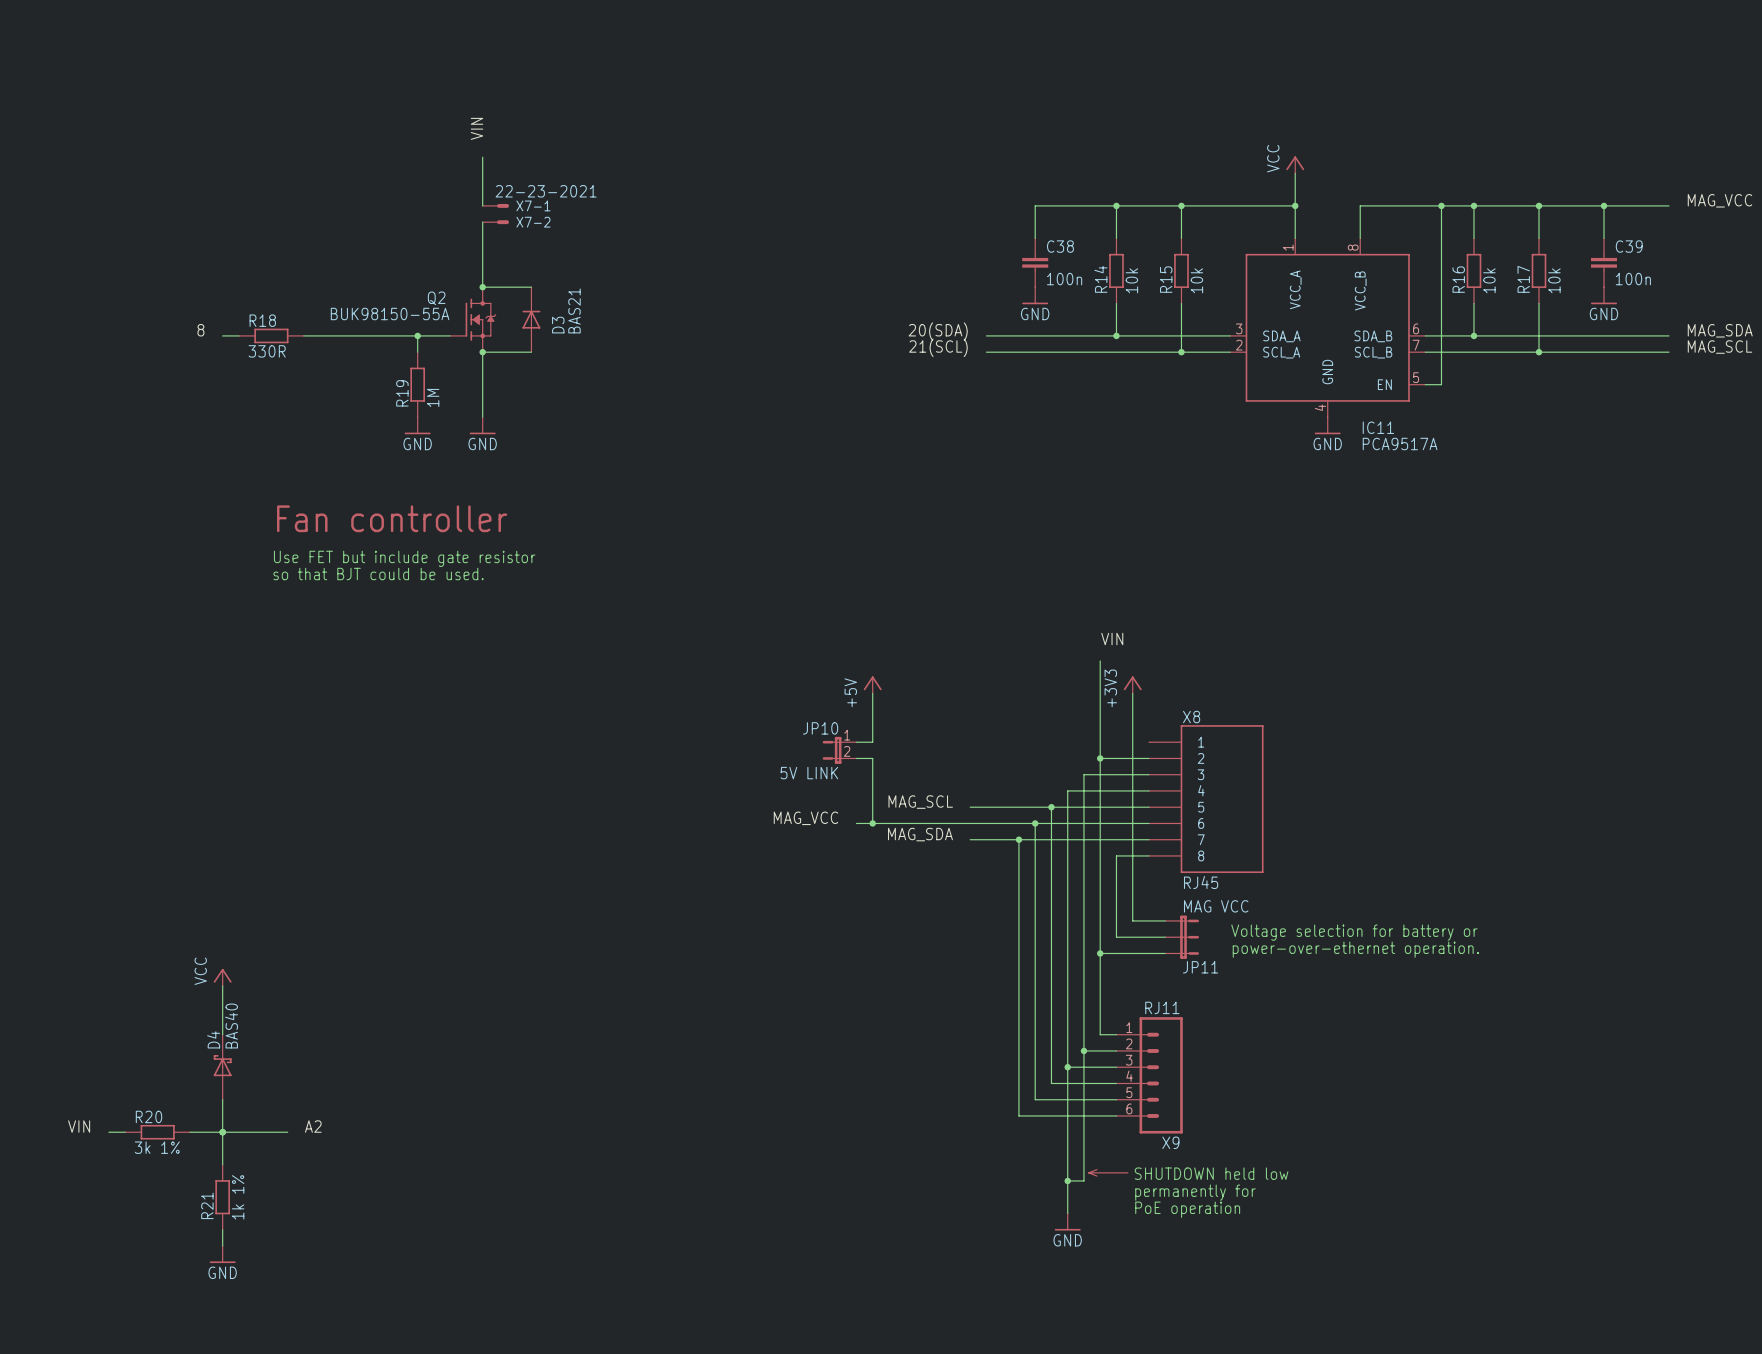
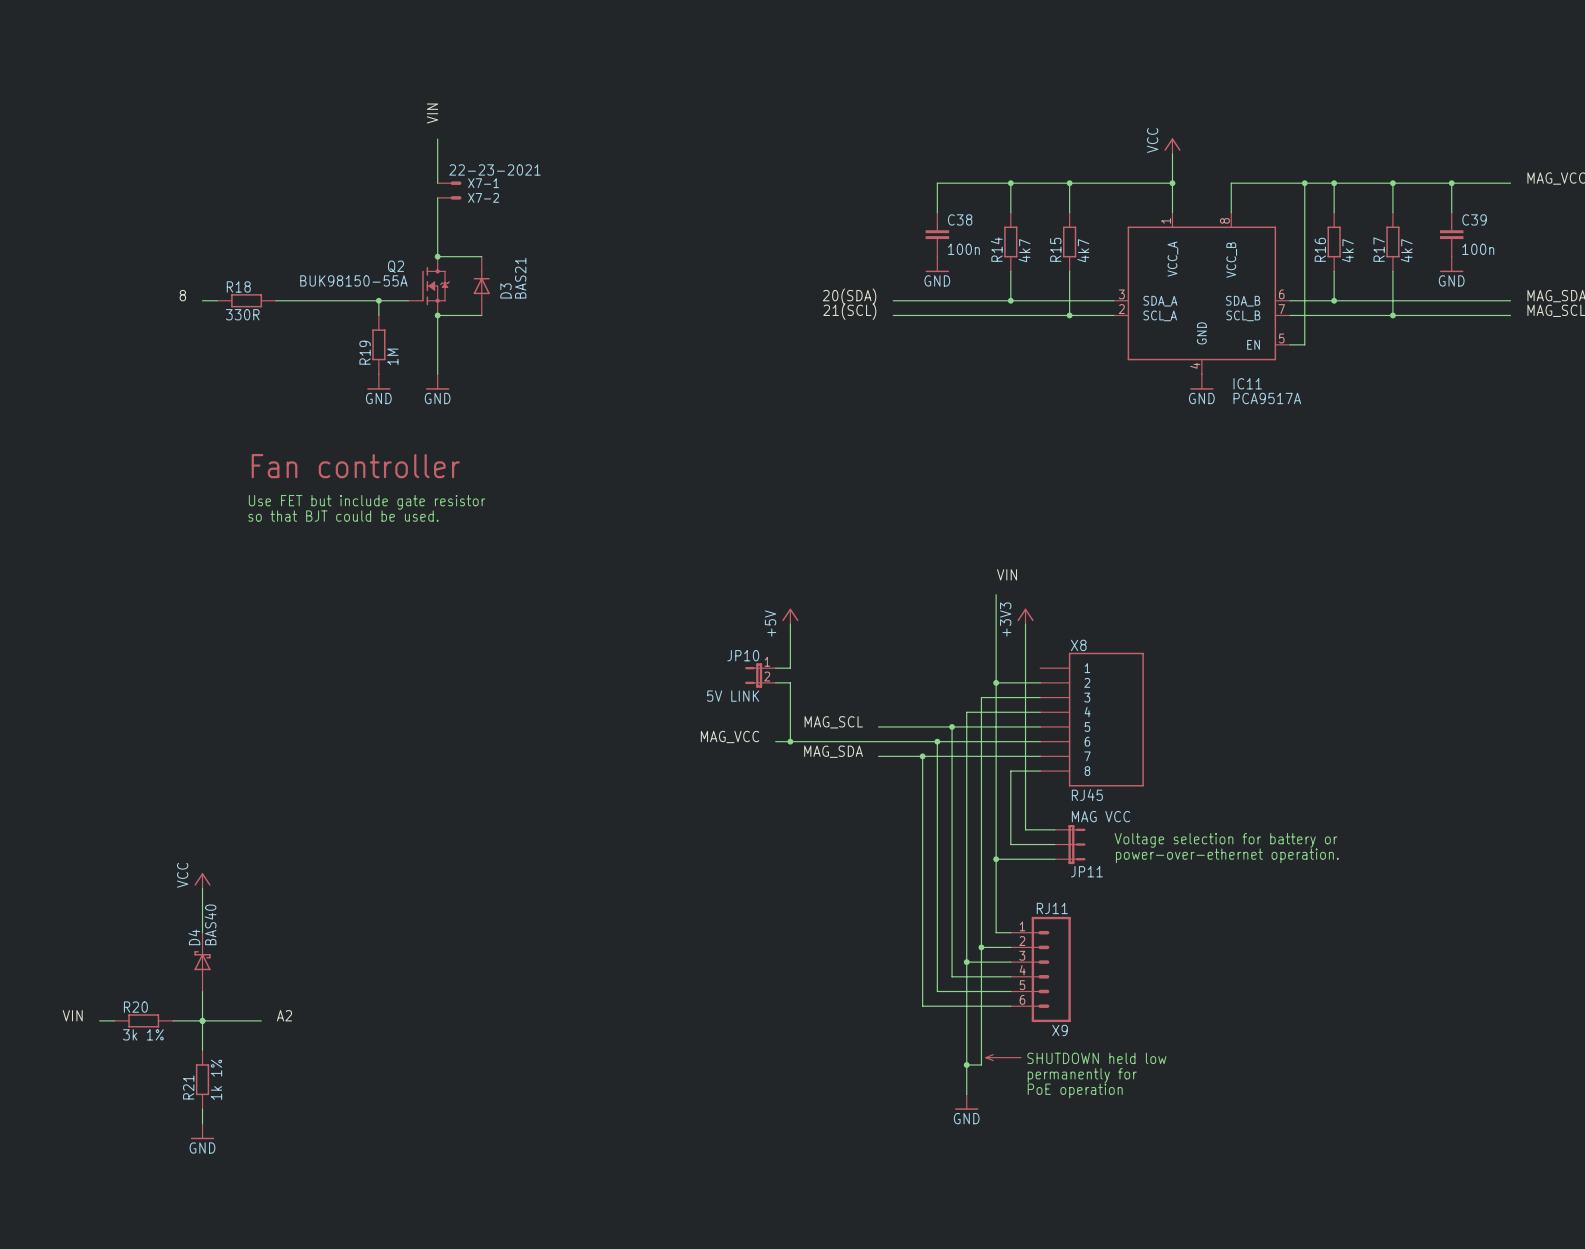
R14 value: 10k (1131, 280) -> 4k7 (1024, 250)
R15 value: 10k (1196, 280) -> 4k7 (1083, 250)
R16 value: 10k (1489, 280) -> 4k7 (1347, 250)
R17 value: 10k (1554, 280) -> 4k7 (1406, 250)

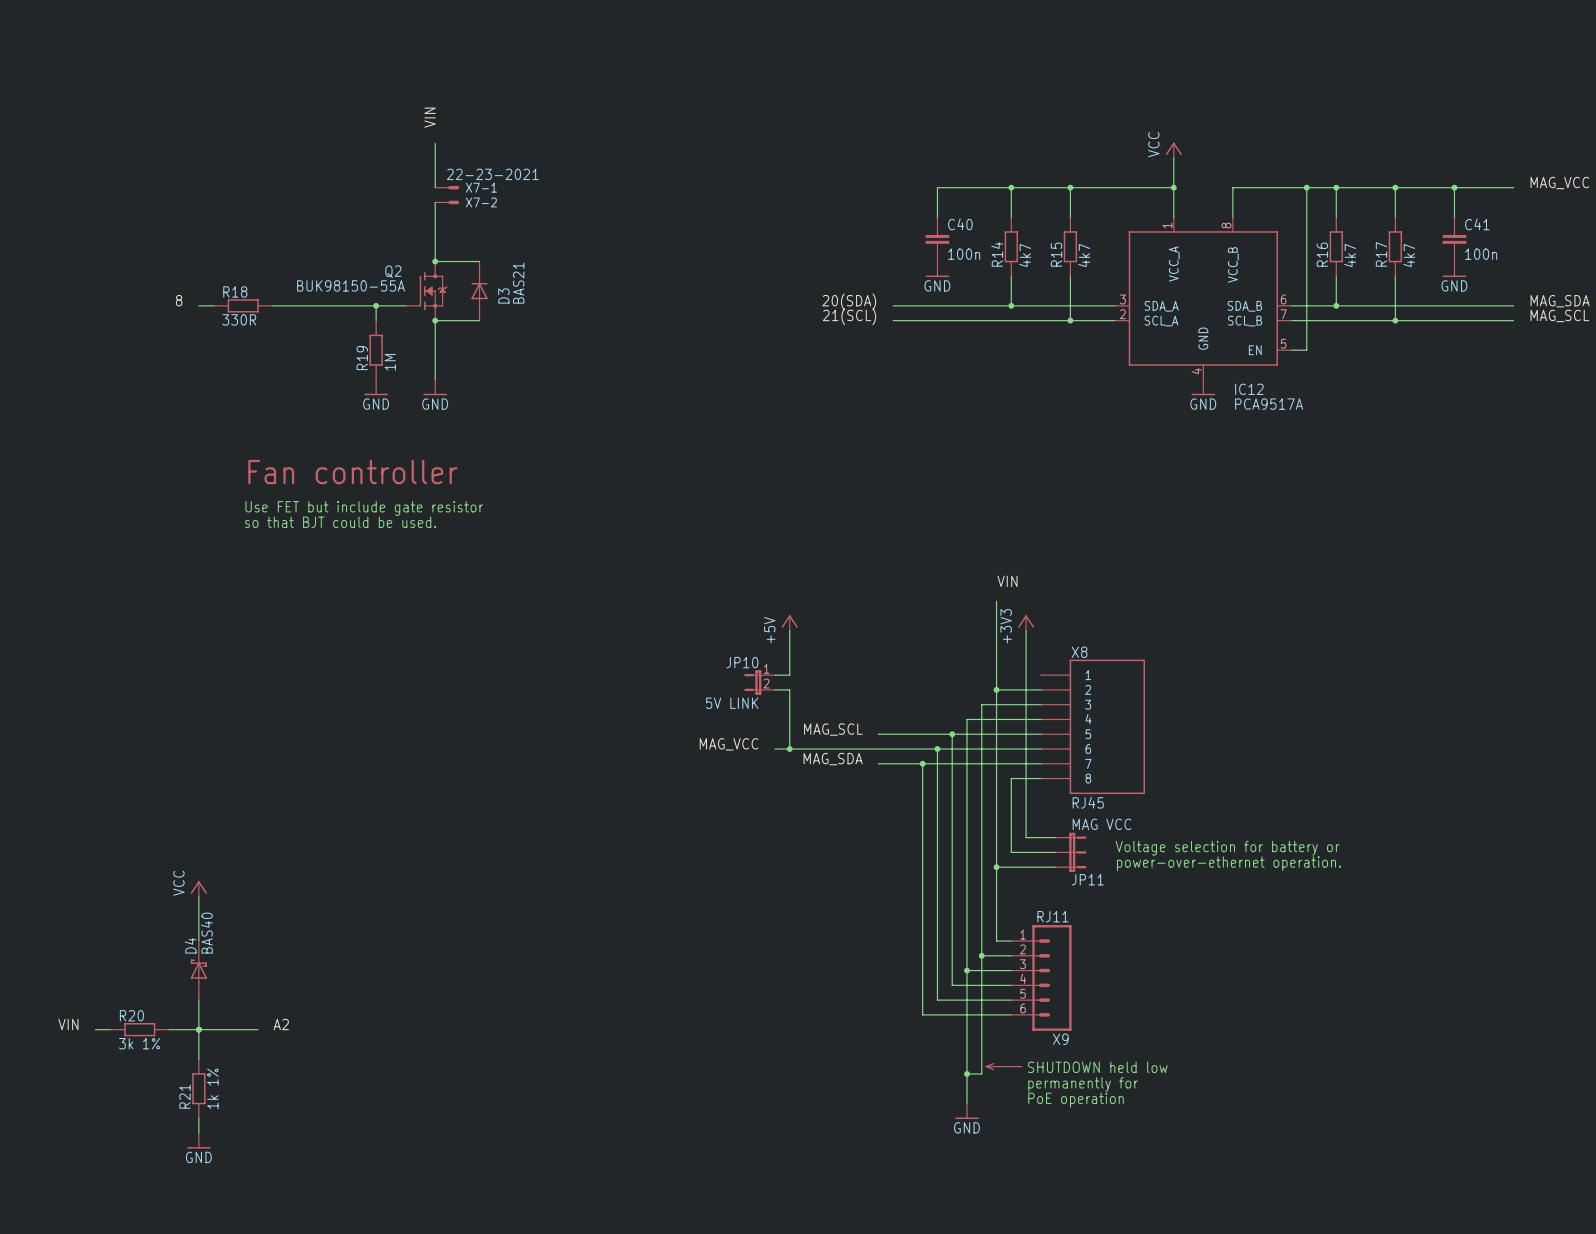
C38 name: C38 (960, 219) -> C40 (960, 224)
C39 name: C39 (1474, 219) -> C41 (1477, 224)
IC11 name: IC11 (1247, 383) -> IC12 (1249, 389)

